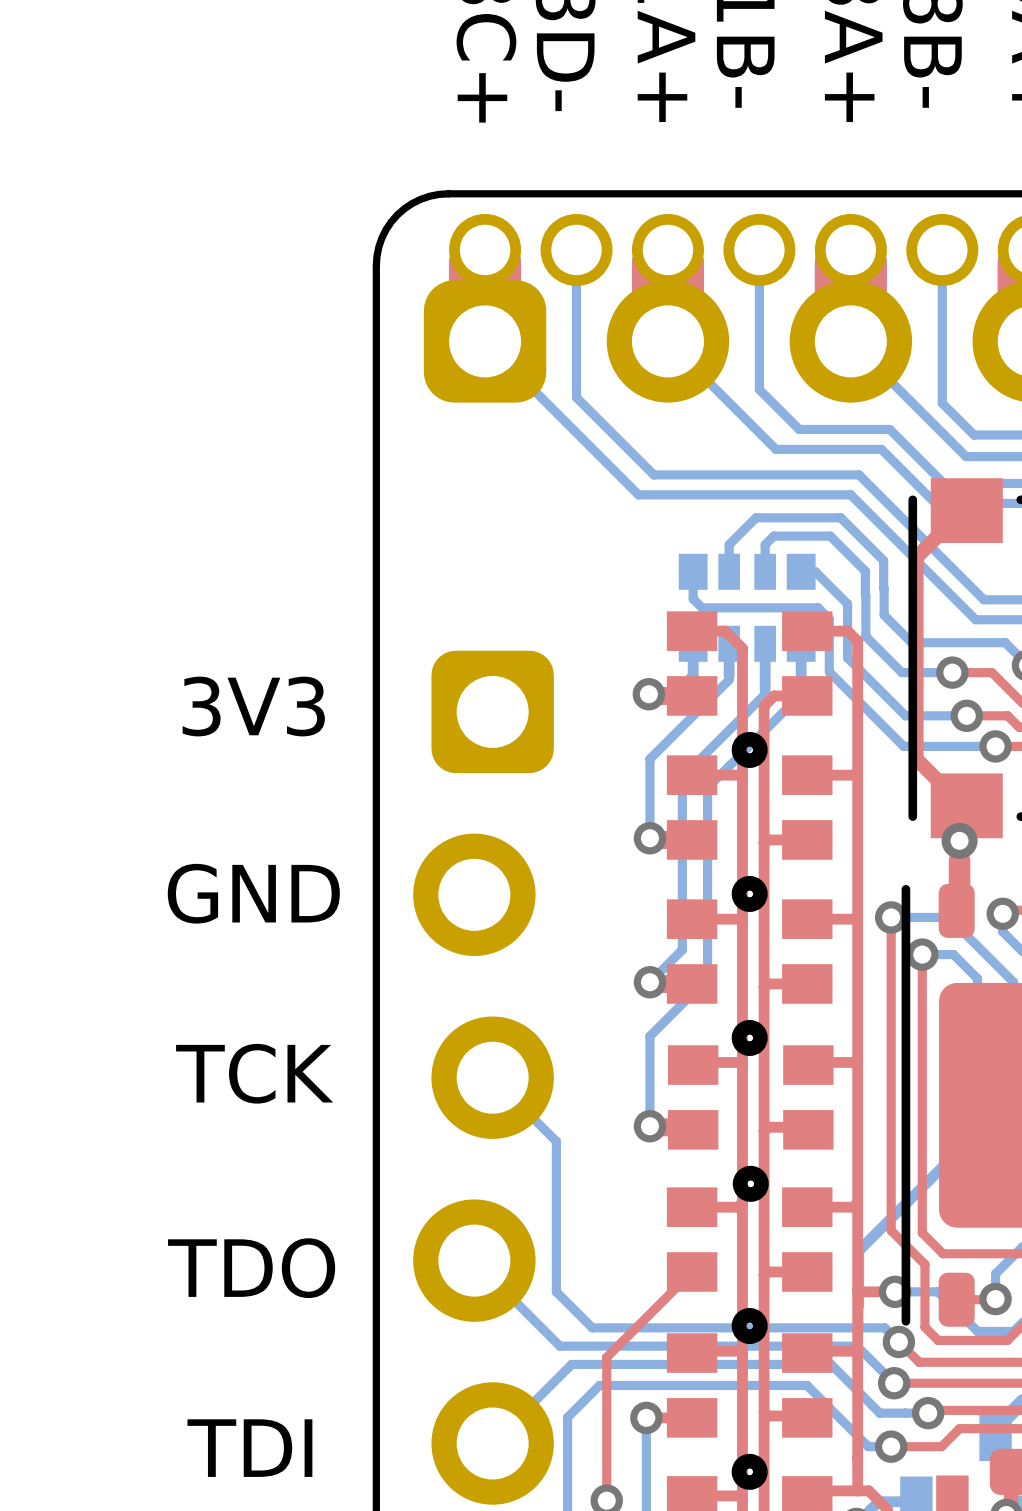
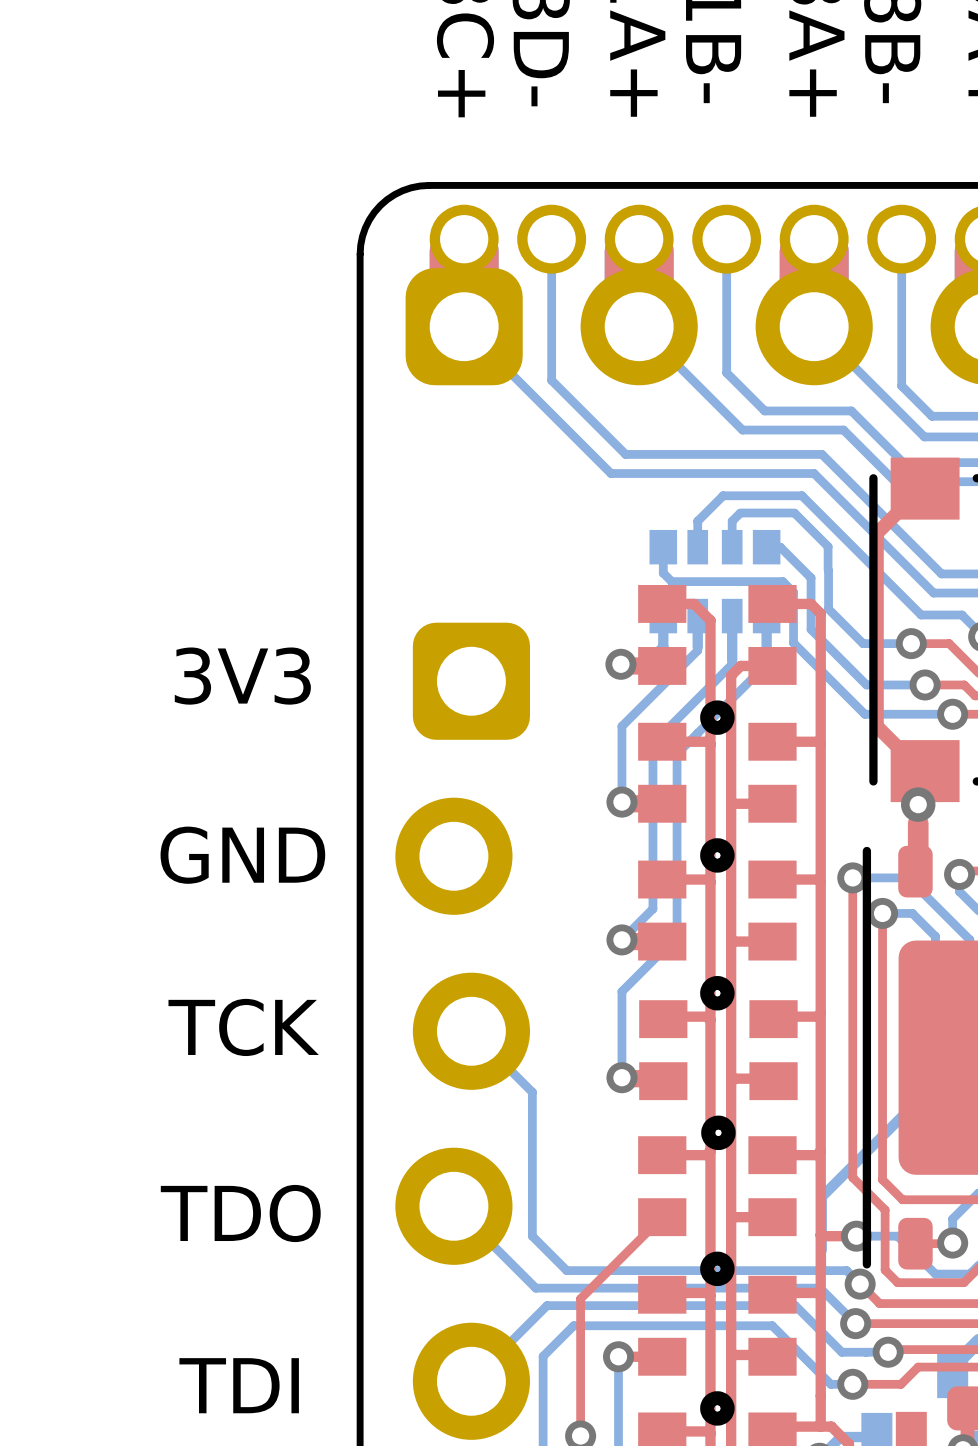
bottom track: (838, 518) (840, 517) (883, 560) (884, 615) (911, 642) (962, 642) -> (802, 495) (921, 615)

